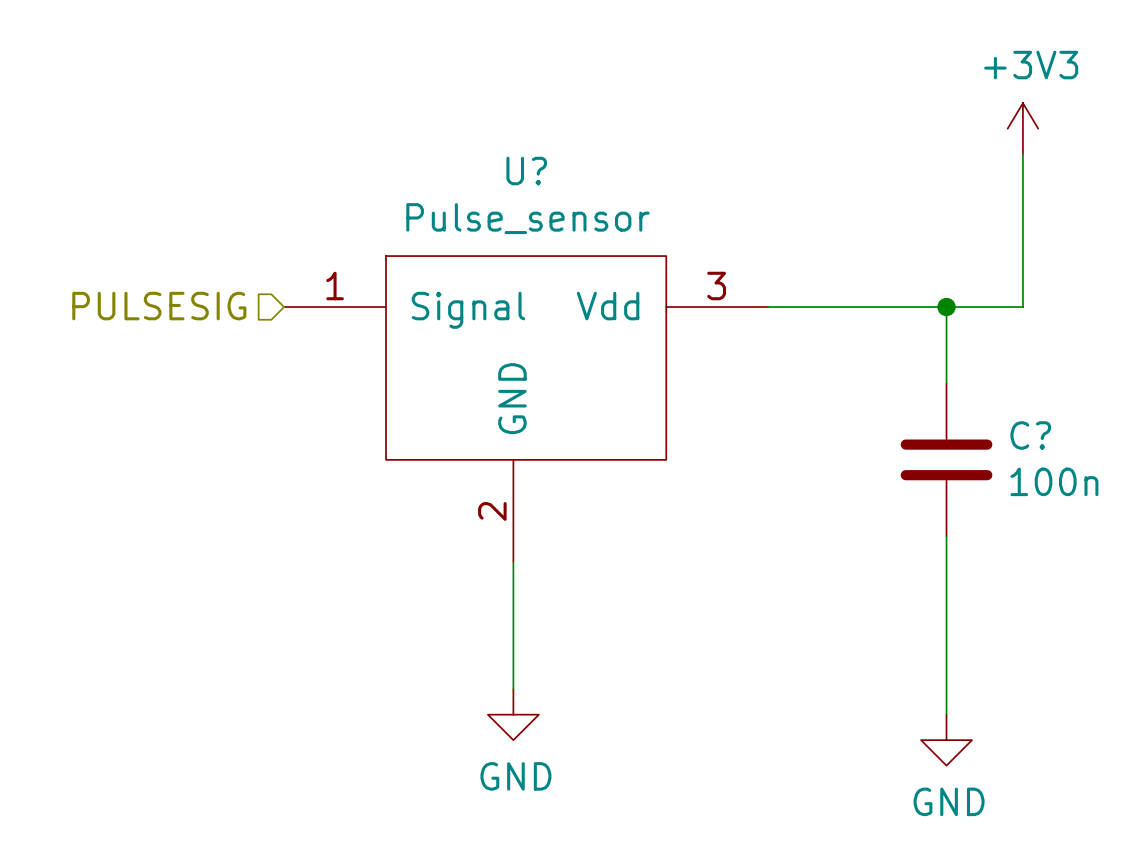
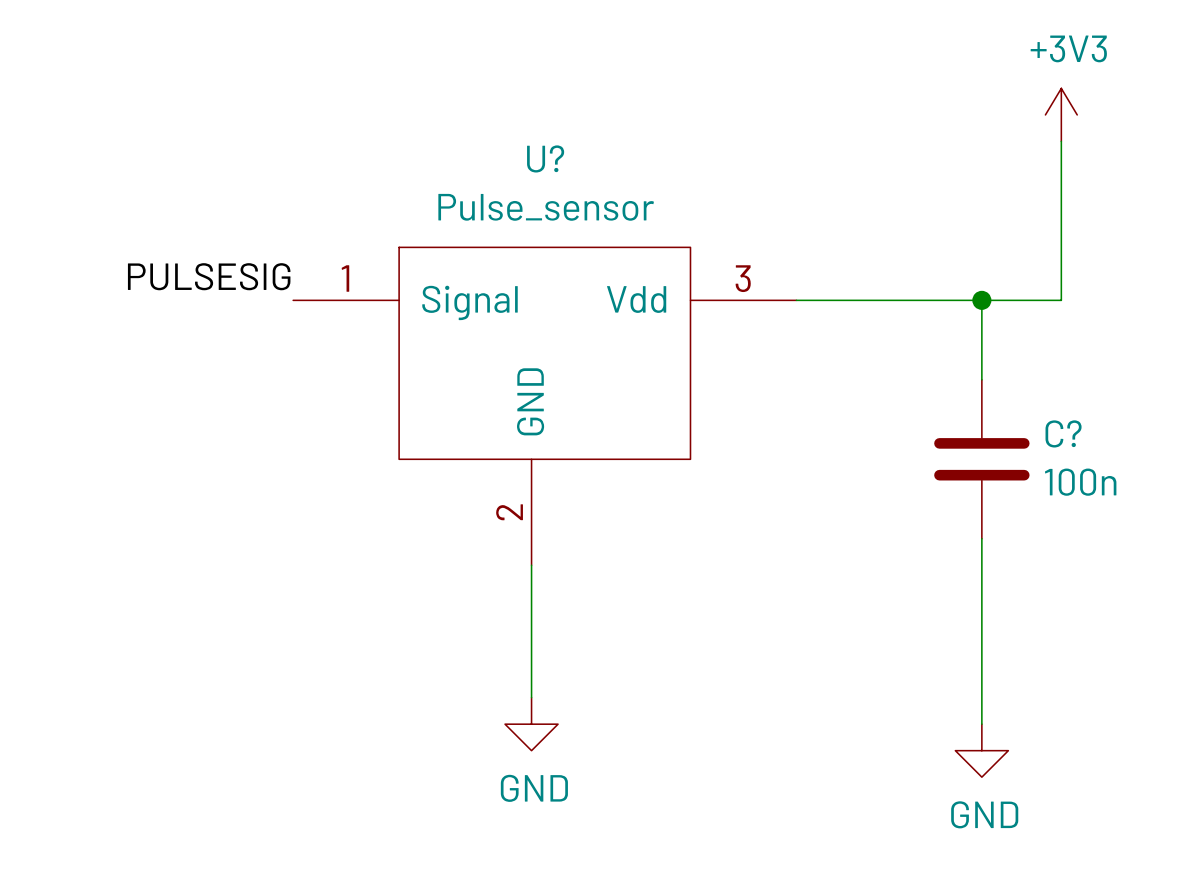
label: none -> PULSESIG (209, 276)
hierarchical label: PULSESIG (159, 306) -> none

